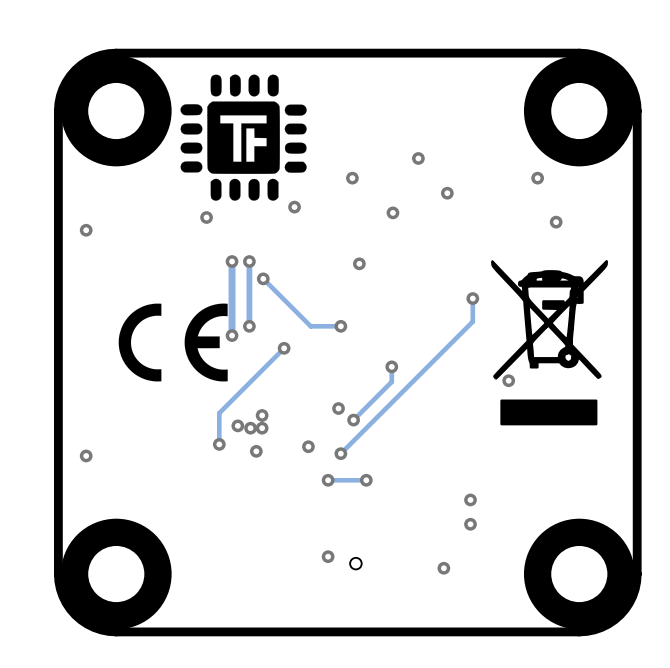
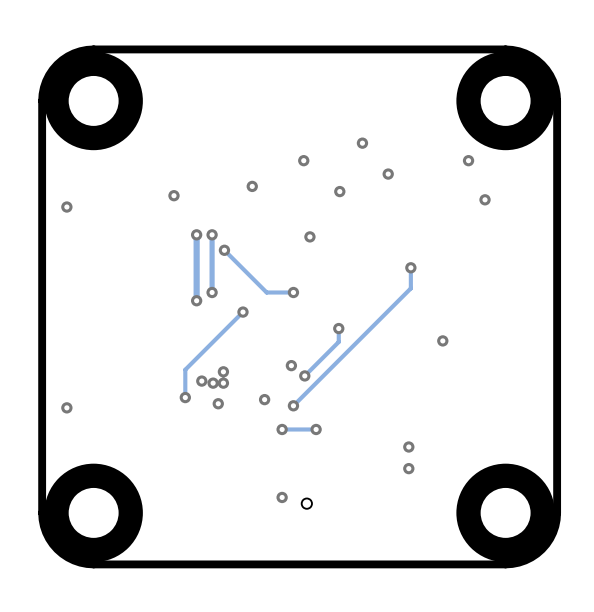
drawing: [180, 74, 307, 201] -> none
drawing: [491, 260, 608, 426] -> none
drawing: [118, 303, 228, 382] -> none
via: (443, 568) -> none

